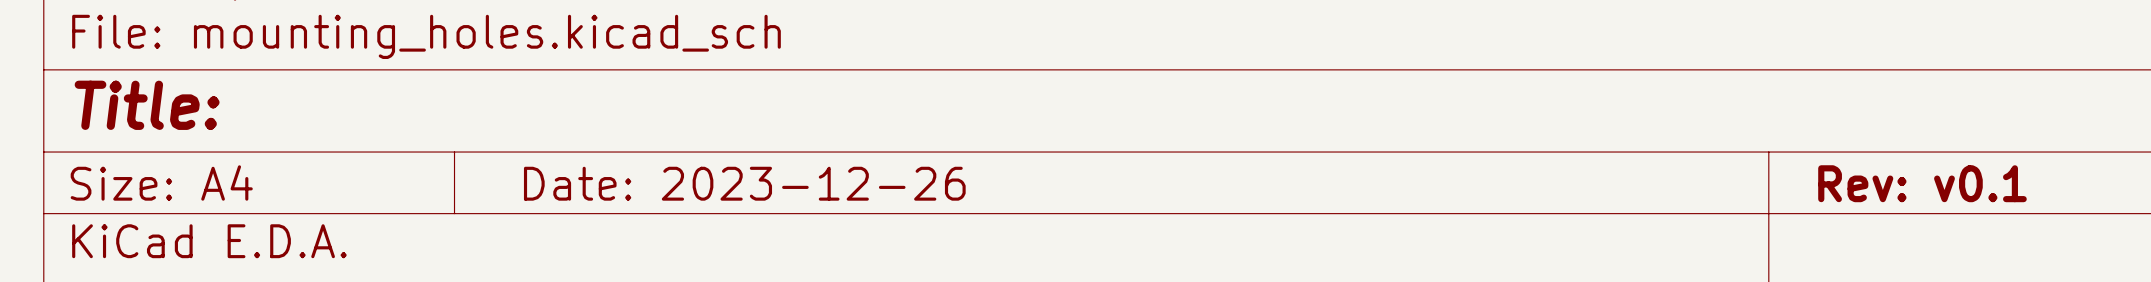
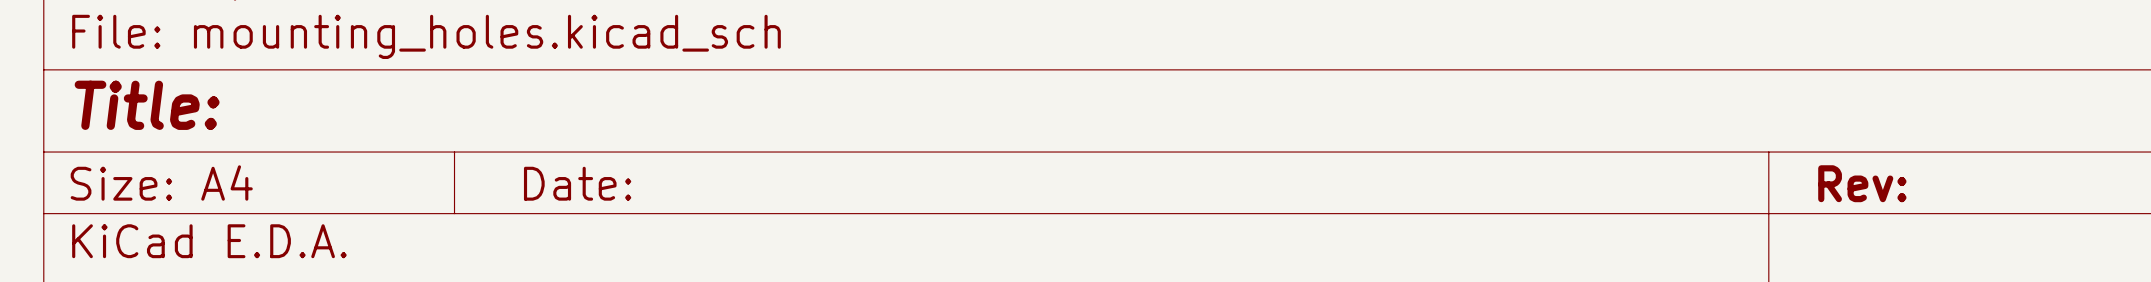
title block: Date: 2023-12-26 (744, 183) -> Date: (577, 183)
title block: Rev: v0.1 (1922, 183) -> Rev: (1862, 183)

